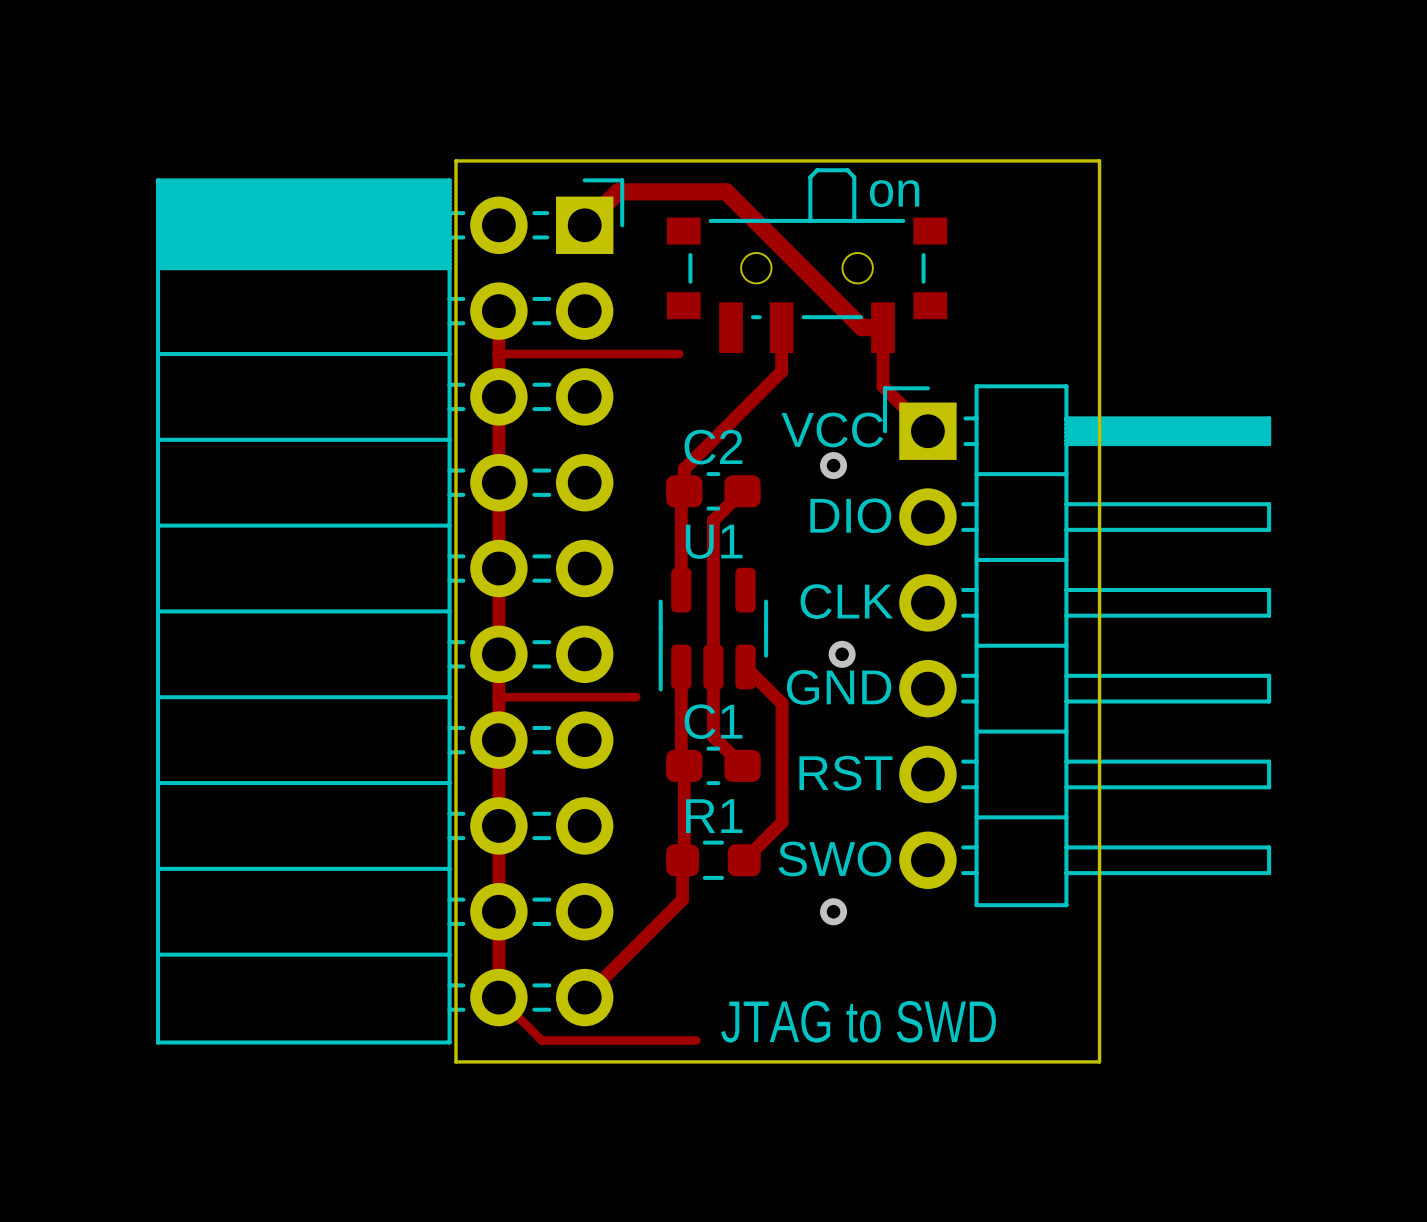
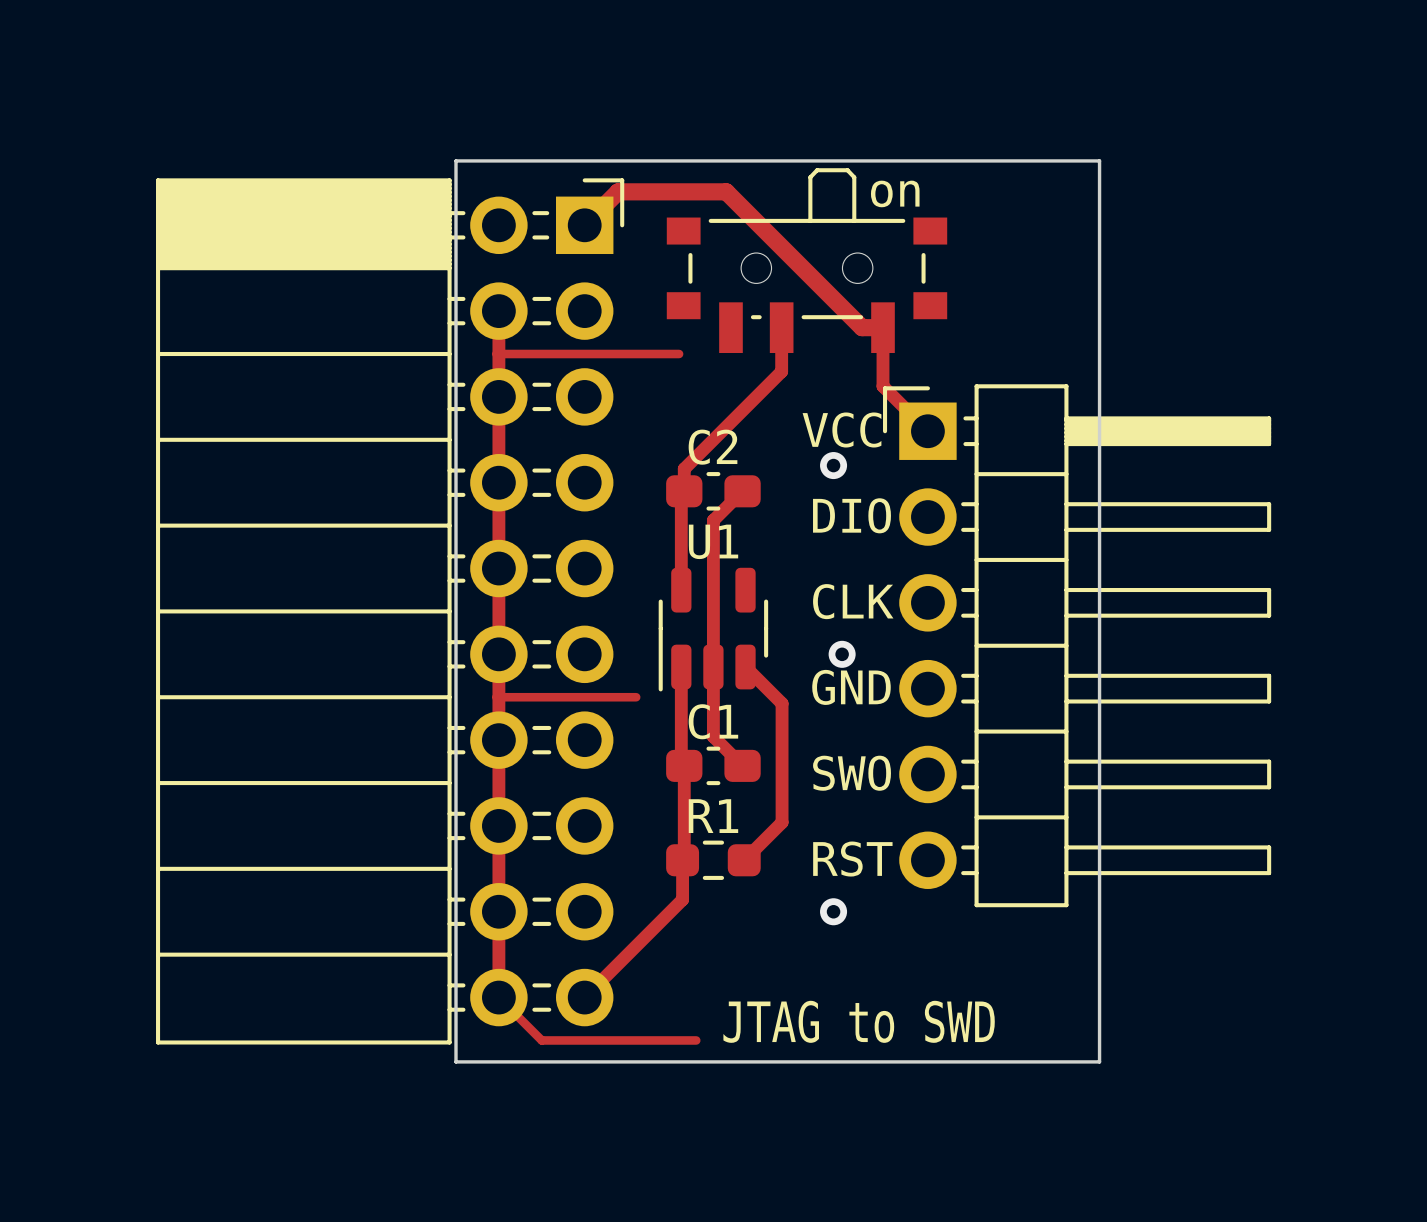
text: RST (845, 773) -> SWO (852, 773)
text: SWO (834, 858) -> RST (852, 859)

